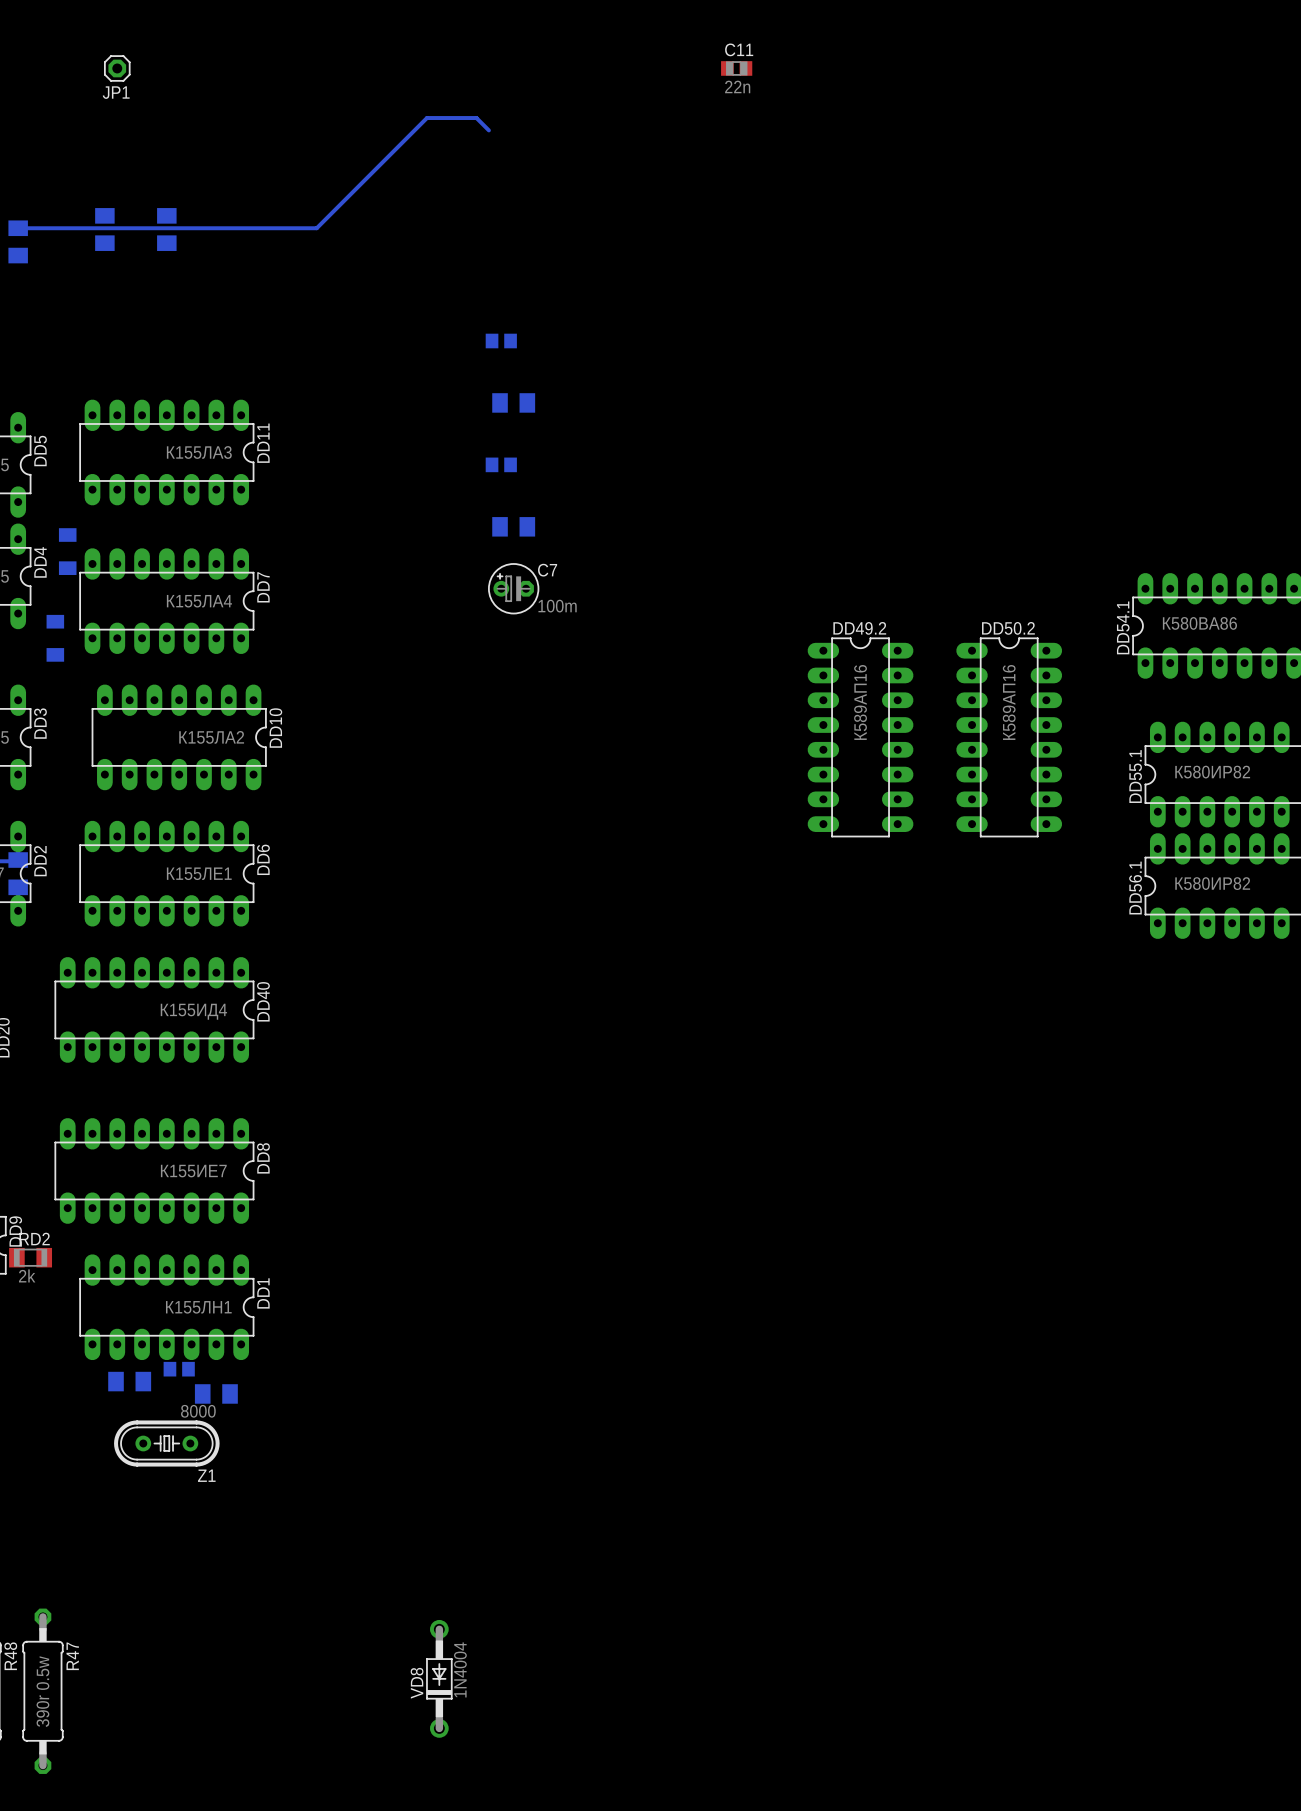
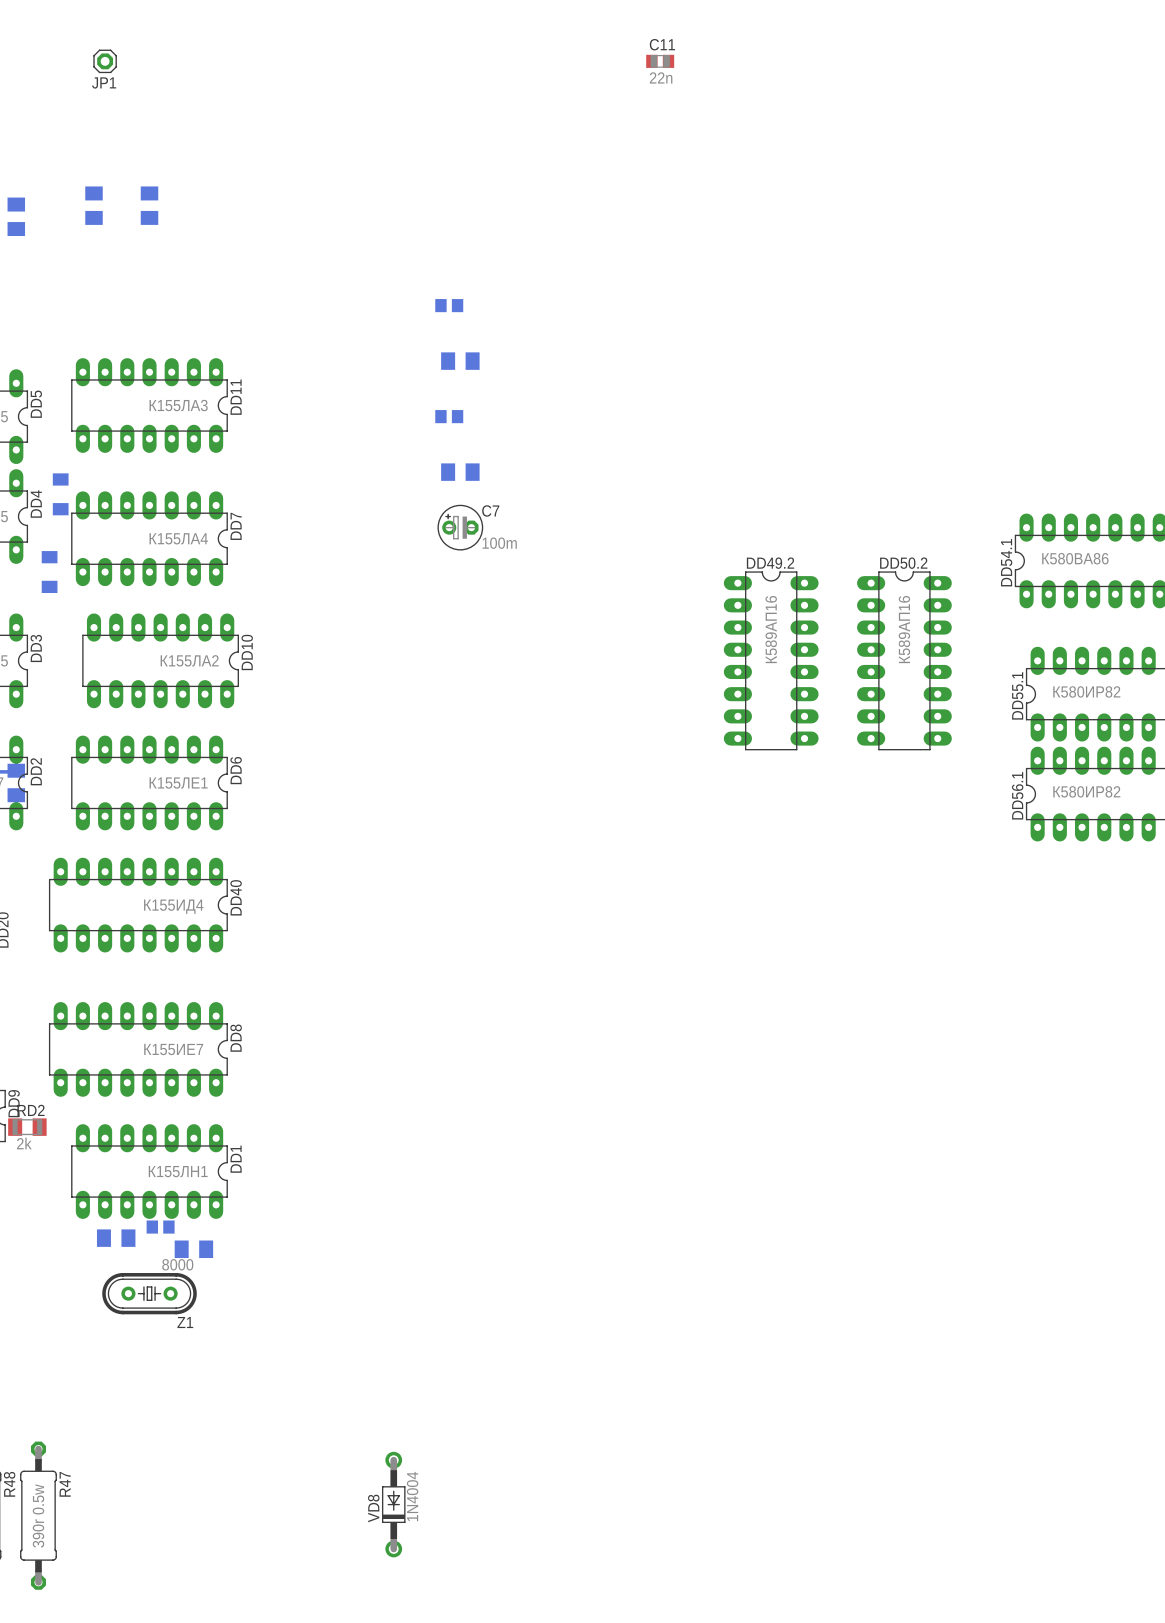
bottom track: (488, 130) (476, 118) (426, 118) (316, 228) (18, 228) -> none

